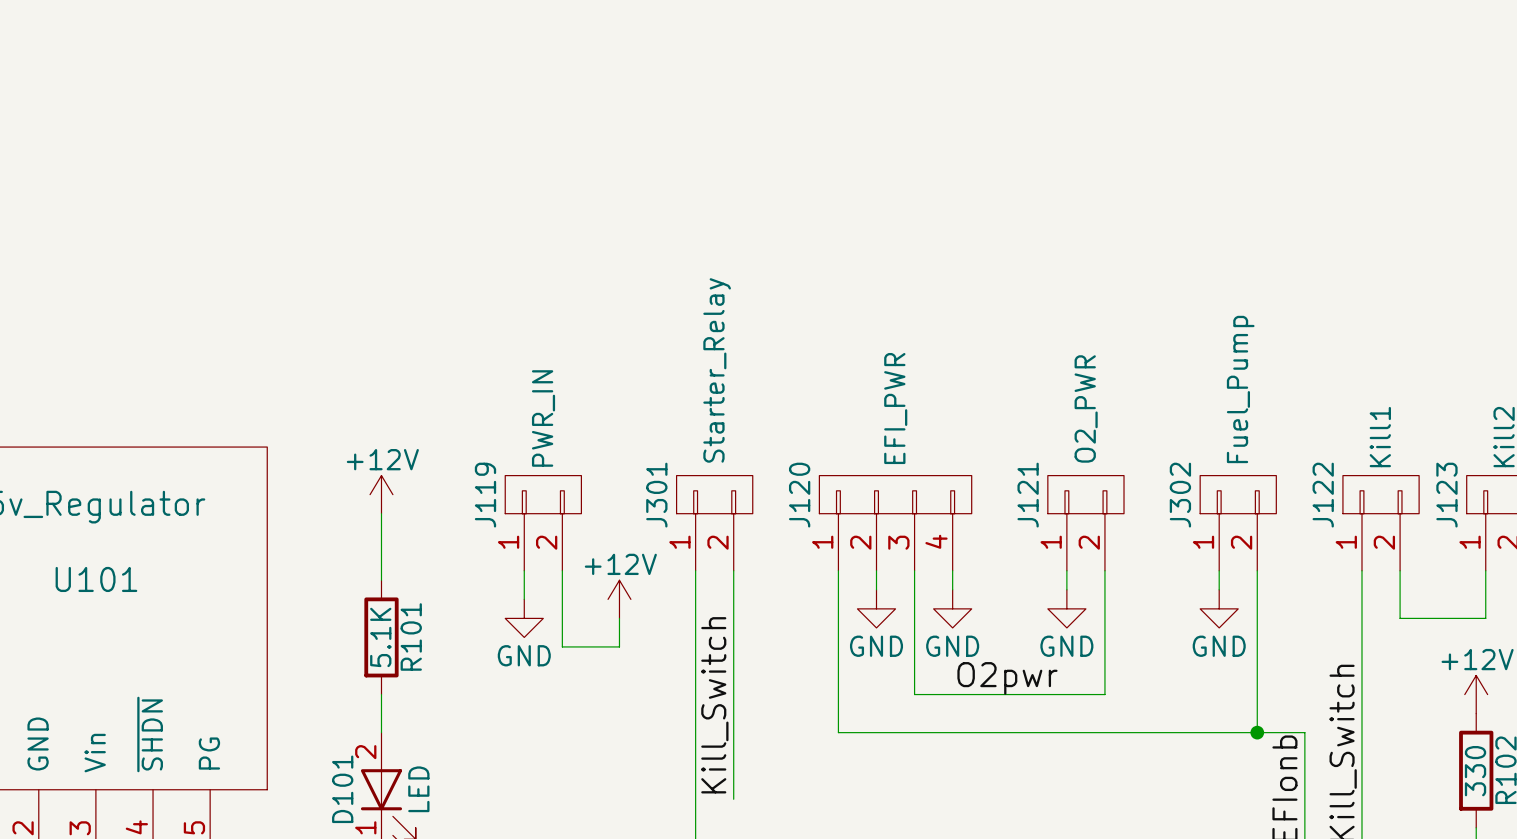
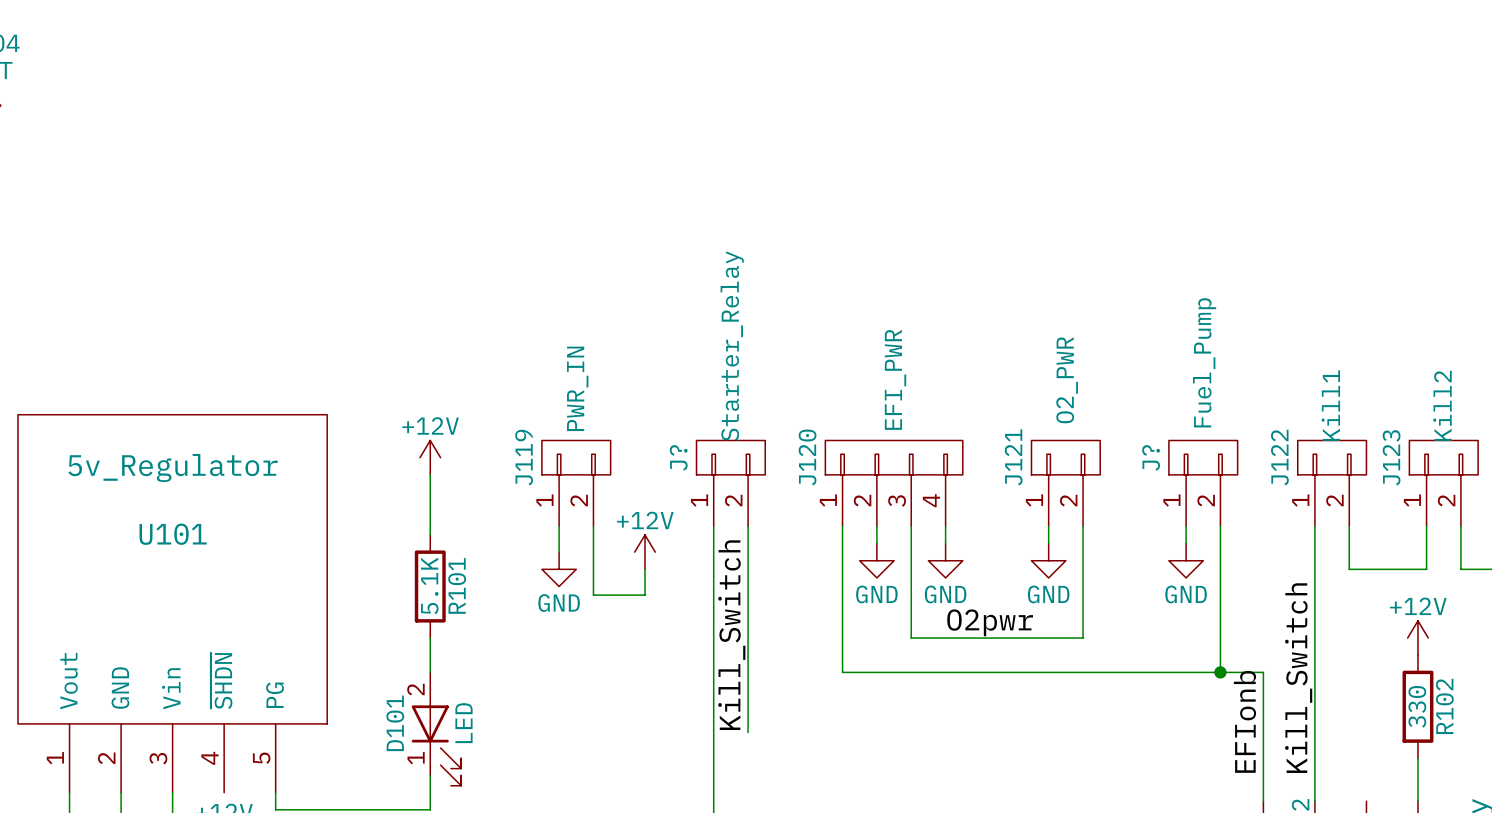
J301 name: J301 (656, 495) -> J? (678, 457)
J302 name: J302 (1180, 495) -> J? (1151, 457)

